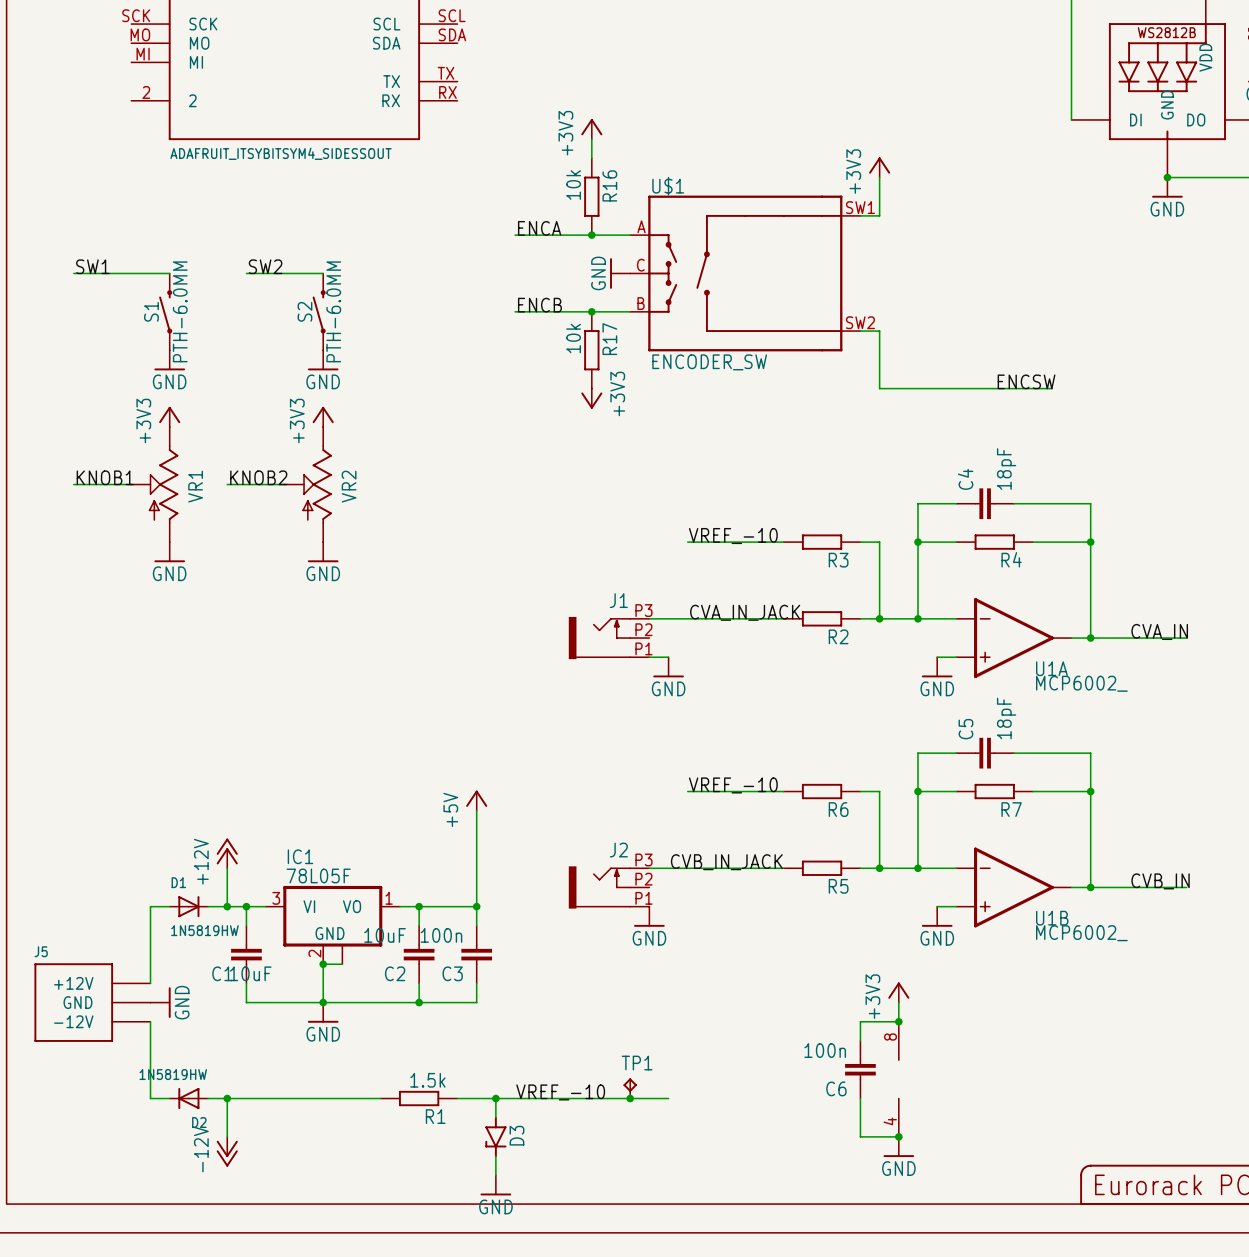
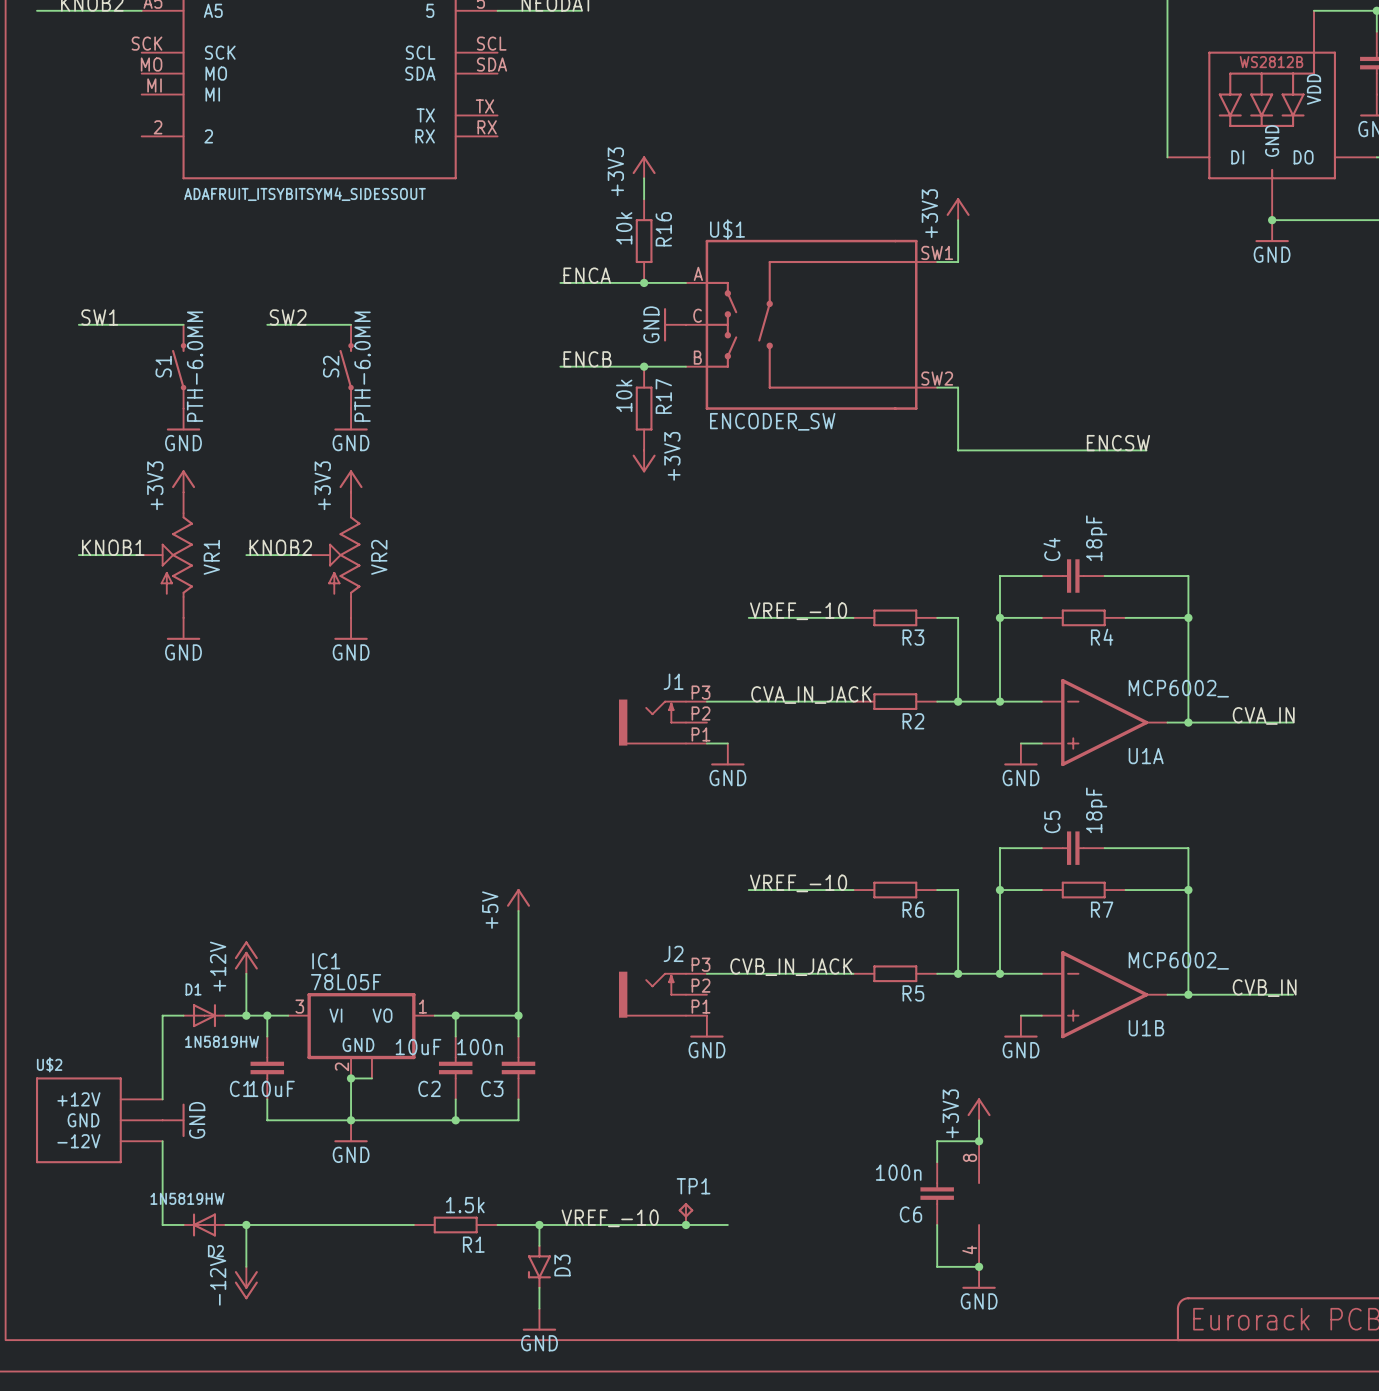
U1A value position: MCP6002_ (1081, 683) -> MCP6002_ (1178, 688)
U1B value position: MCP6002_ (1081, 933) -> MCP6002_ (1178, 960)
J5 name: J5 (41, 951) -> U$2 (49, 1064)

